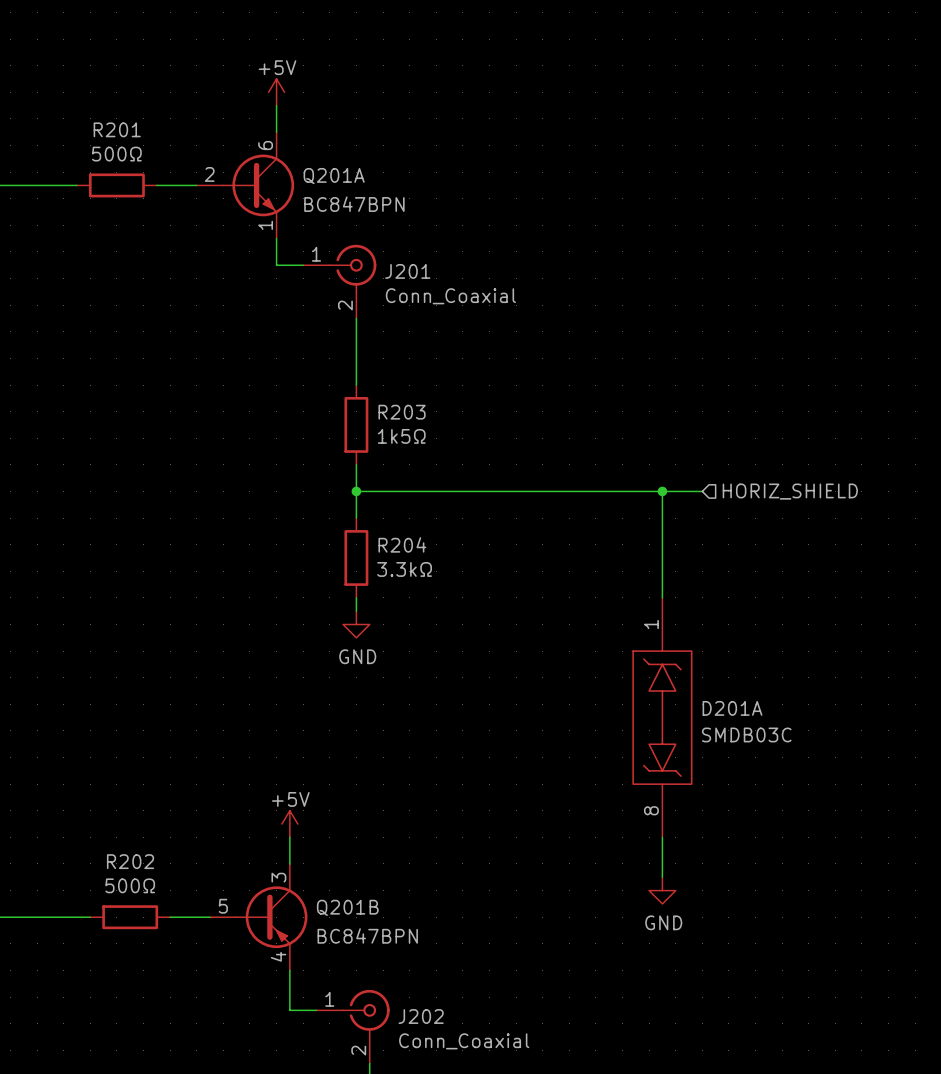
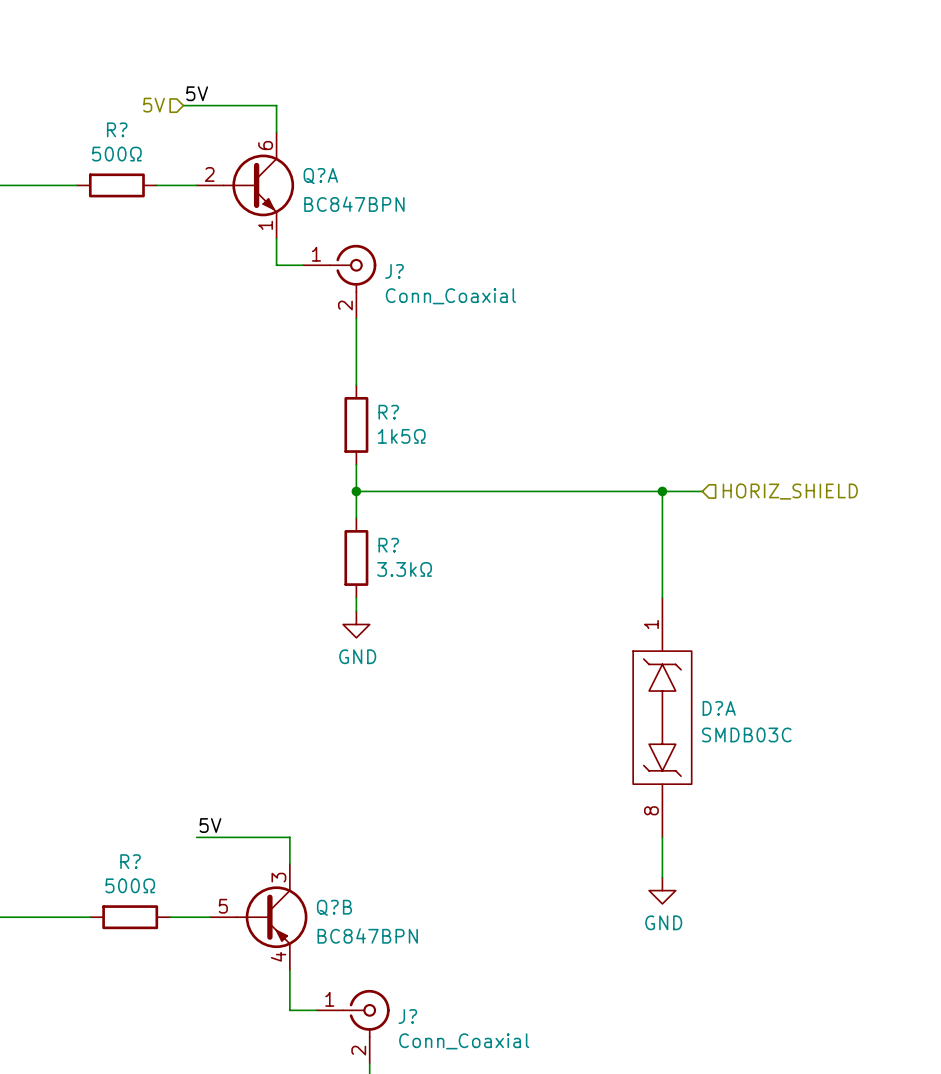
power symbol: +5V (276, 92) -> none
label: none -> 5V (197, 93)
hierarchical label: none -> 5V (154, 105)
wire: none -> (183, 105) (276, 105)
R201 name: R201 (117, 129) -> R? (117, 129)
Q201A name: Q201A (334, 176) -> Q?A (320, 176)
J201 name: J201 (407, 271) -> J? (394, 271)
R203 name: R203 (402, 412) -> R? (388, 412)
R204 name: R204 (402, 544) -> R? (388, 545)
D201A name: D201A (732, 708) -> D?A (719, 708)
power symbol: +5V (289, 824) -> none
label: none -> 5V (210, 825)
wire: none -> (196, 837) (289, 837)
R202 name: R202 (130, 861) -> R? (130, 861)
Q201B name: Q201B (347, 907) -> Q?B (334, 907)
J202 name: J202 (421, 1016) -> J? (407, 1016)

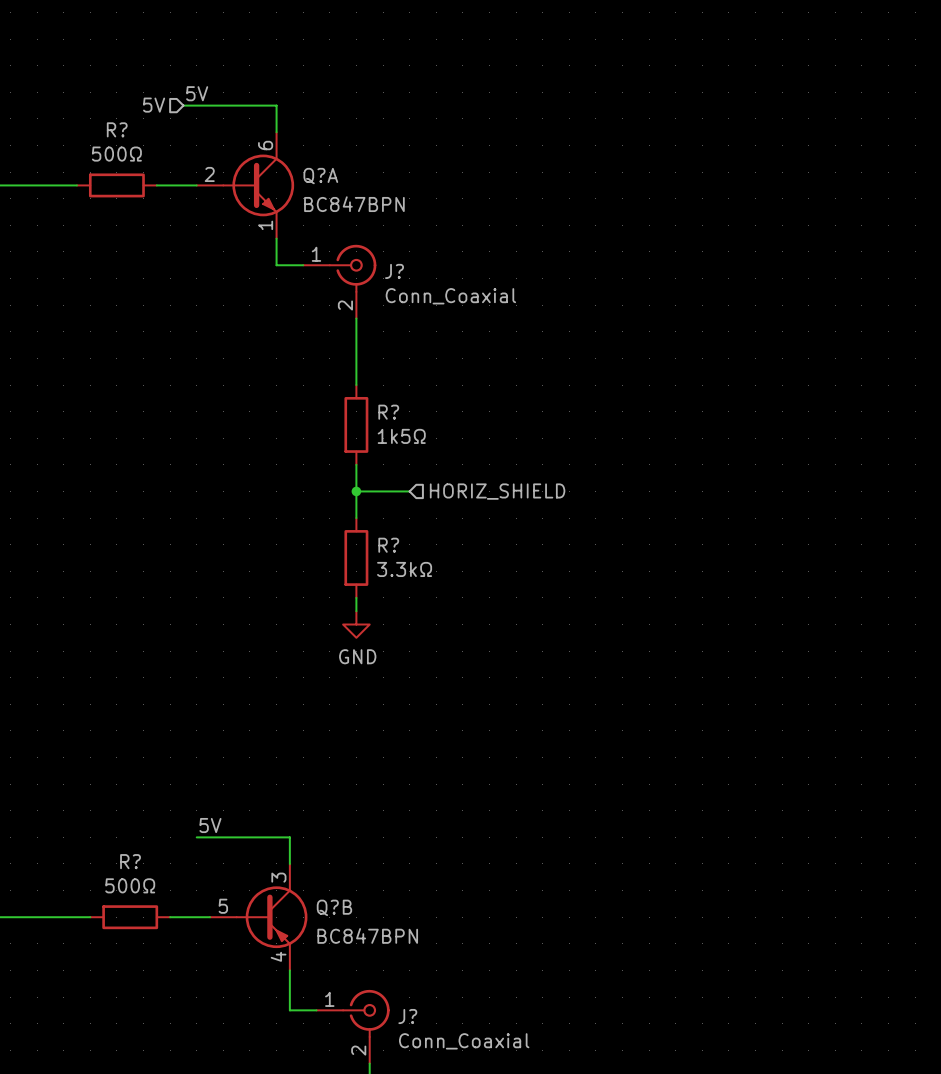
wire: (409, 491) (702, 491) -> none
hierarchical label: none -> HORIZ_SHIELD (497, 491)
wire: (662, 491) (662, 597) -> none
junction: (662, 491) -> none
hierarchical label: HORIZ_SHIELD (790, 491) -> none
D?A: SMDB03C (662, 717) -> none
wire: (662, 837) (662, 877) -> none
power symbol: GND (662, 890) -> none

